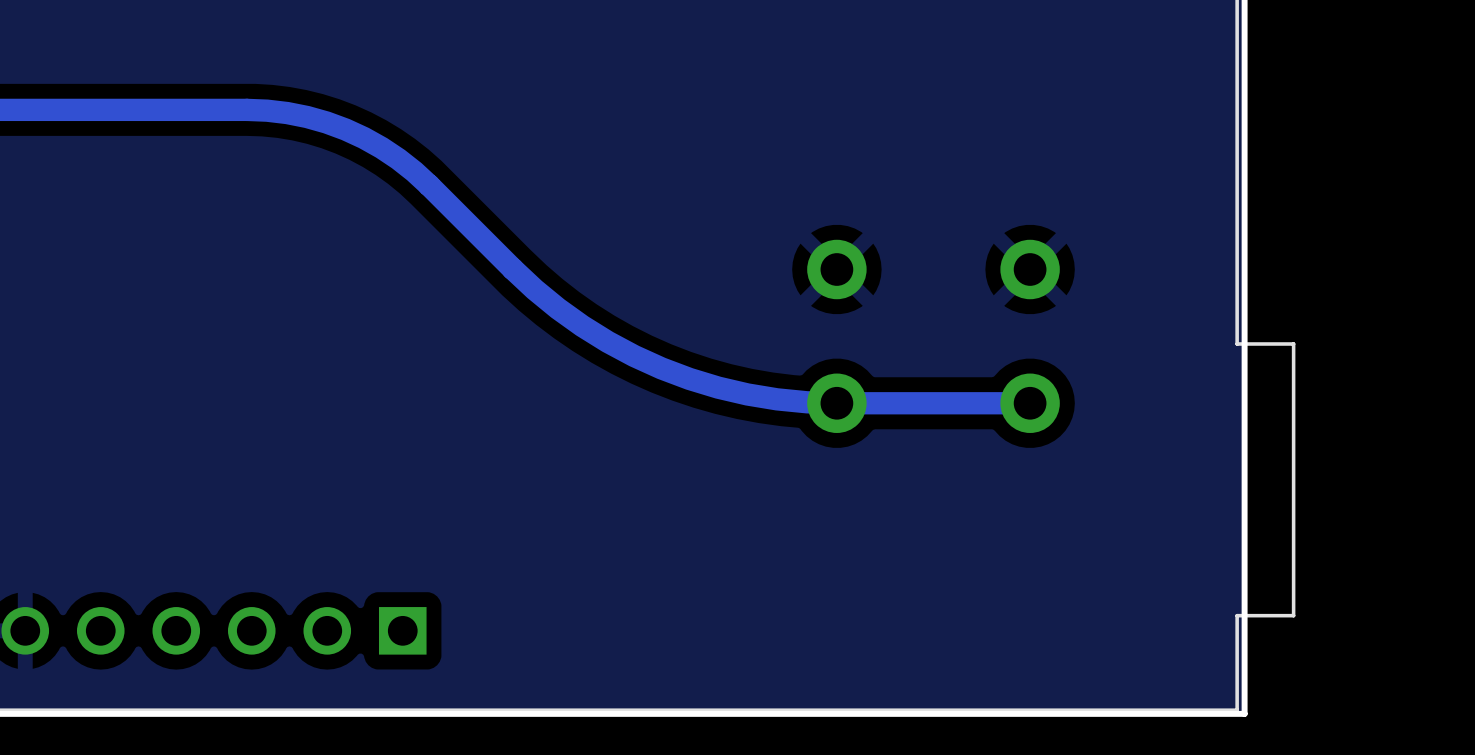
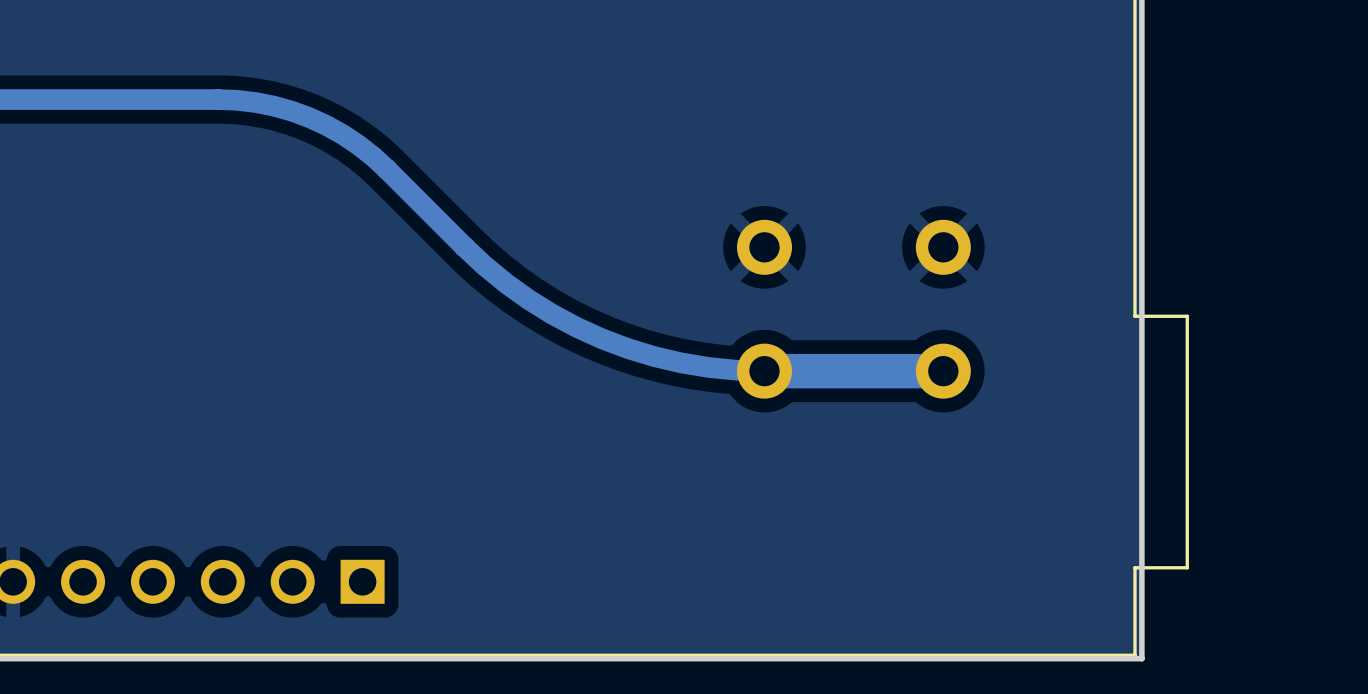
track width: thin (1030, 403) (836, 403) -> thick (943, 371) (764, 371)

